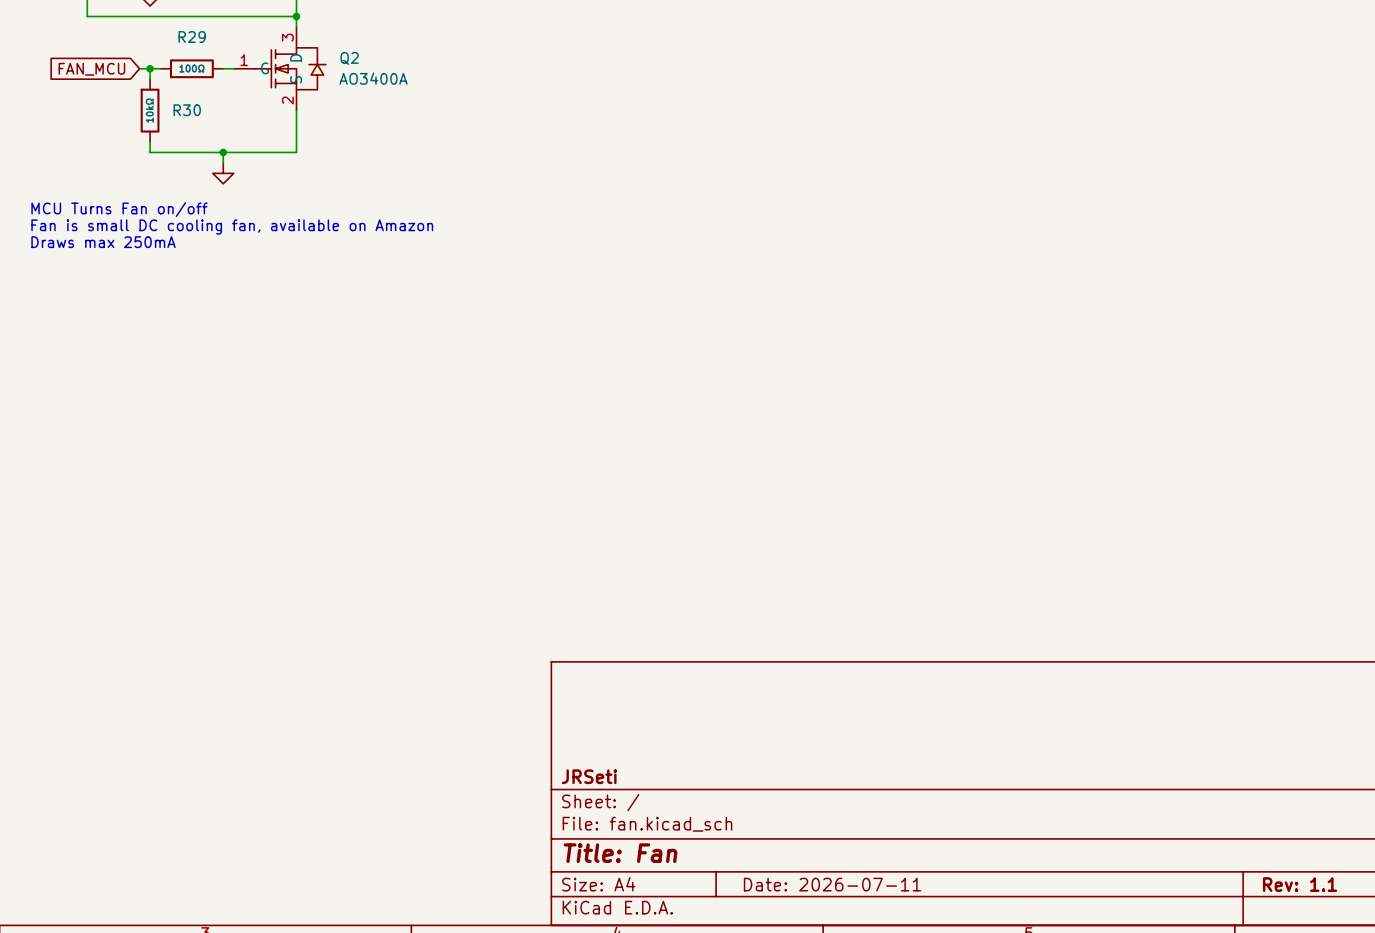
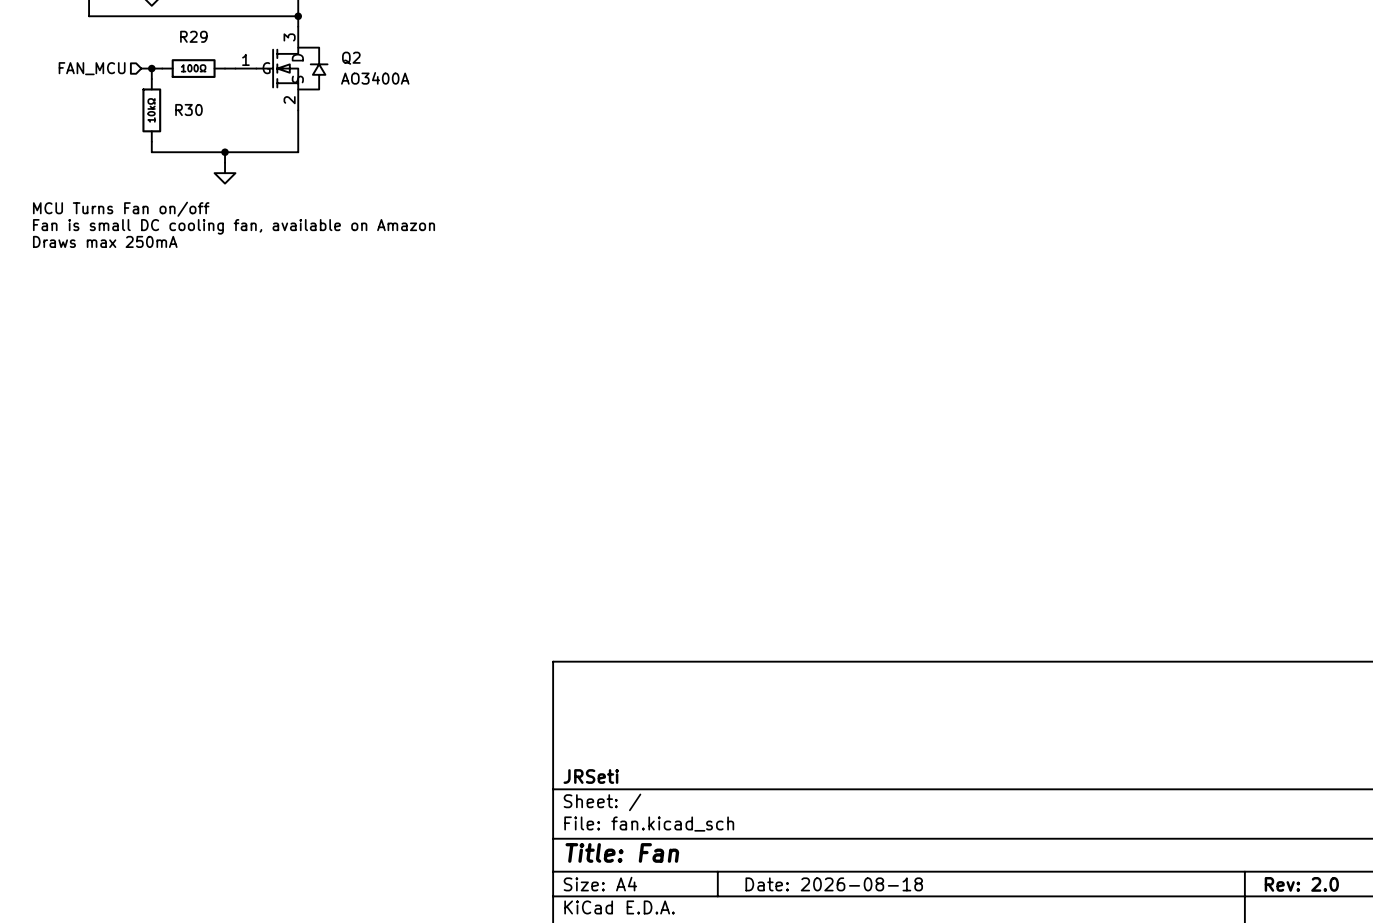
hierarchical label: none -> FAN_MCU (92, 68)
global label: FAN_MCU (91, 69) -> none
title block: Date: 2026-07-11 (832, 884) -> Date: 2026-08-18 (834, 884)
title block: Rev: 1.1 (1300, 884) -> Rev: 2.0 (1301, 884)

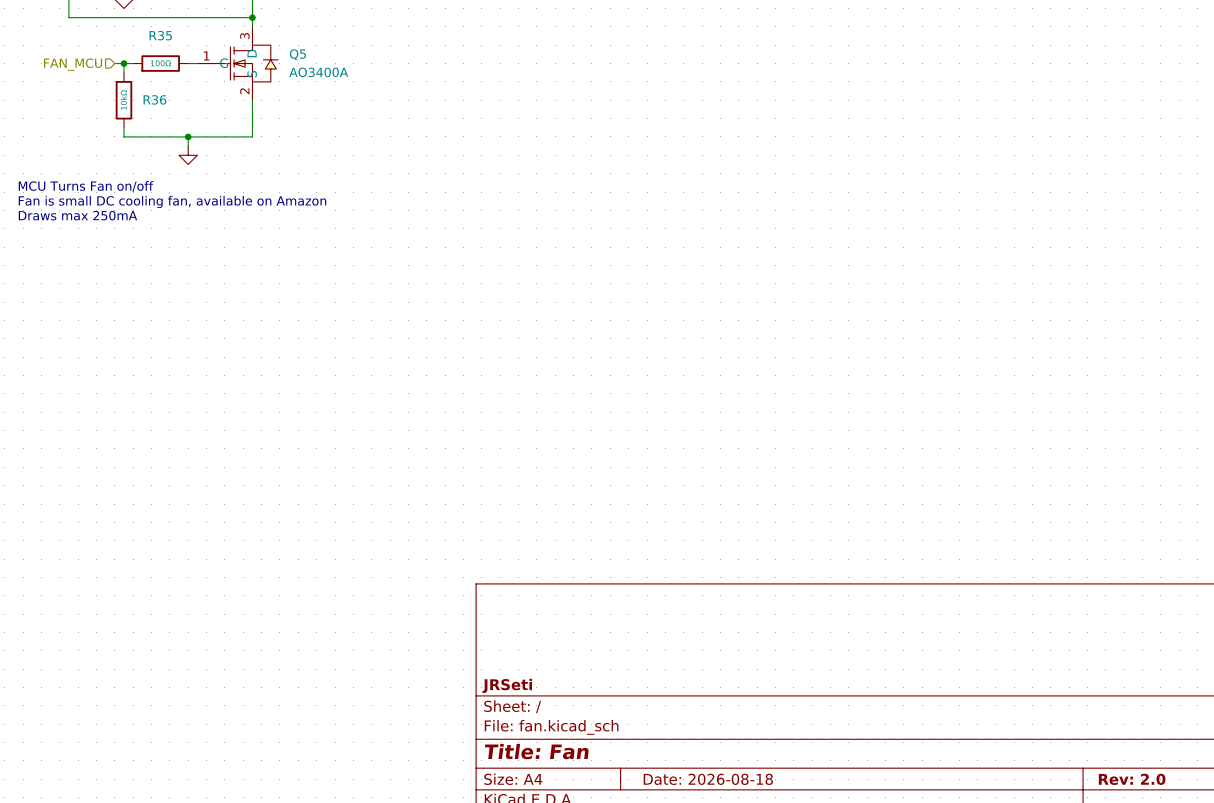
R29 name: R29 (193, 36) -> R35 (160, 35)
Q2 name: Q2 (351, 58) -> Q5 (297, 54)
R30 name: R30 (188, 110) -> R36 (154, 99)

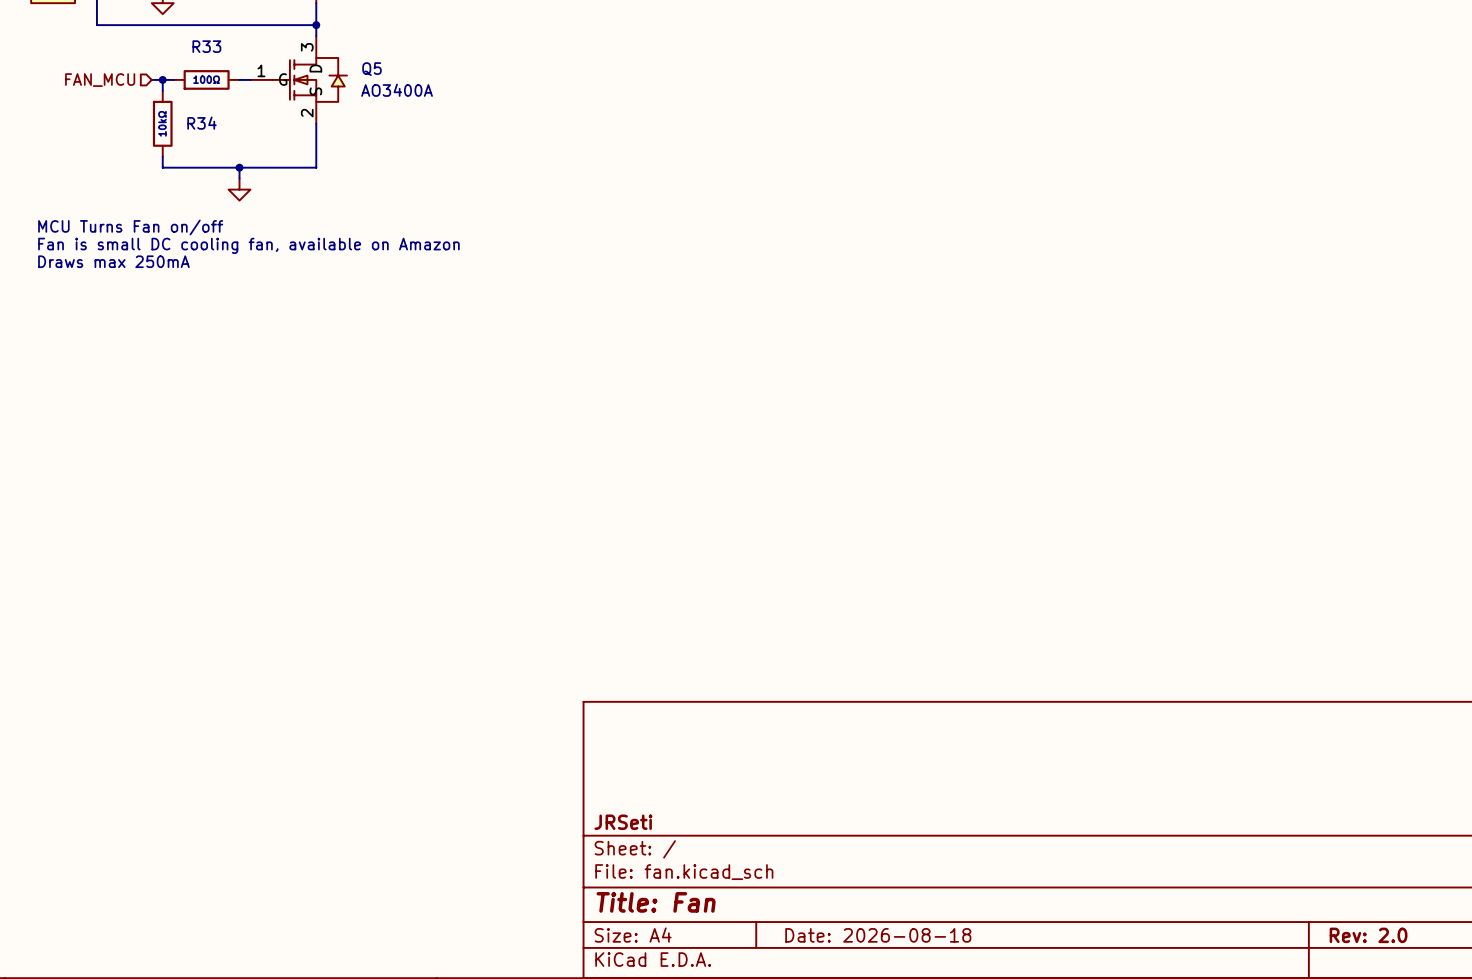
R35 name: R35 (160, 35) -> R33 (206, 46)
R36 name: R36 (154, 99) -> R34 (201, 123)

